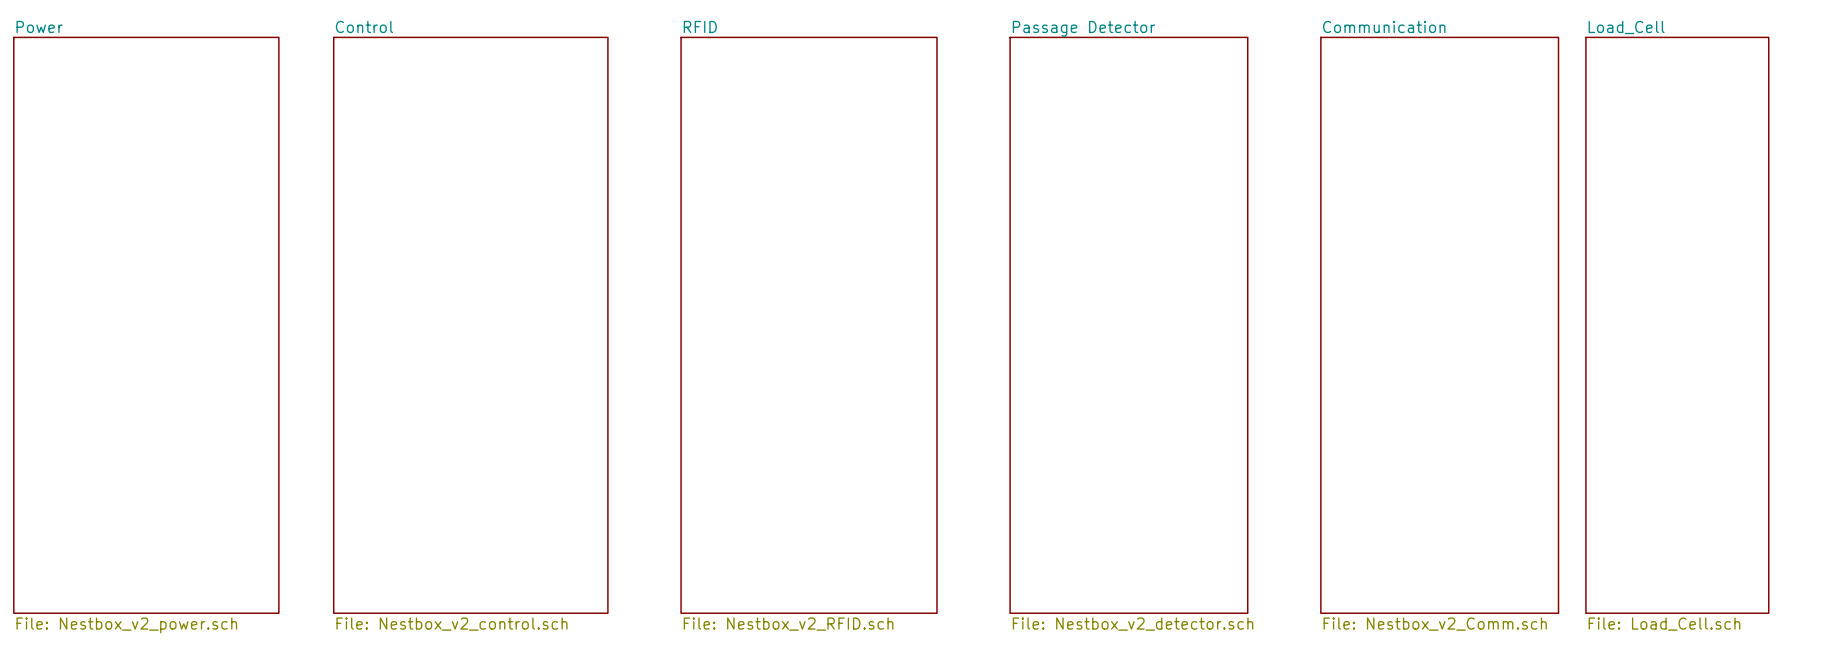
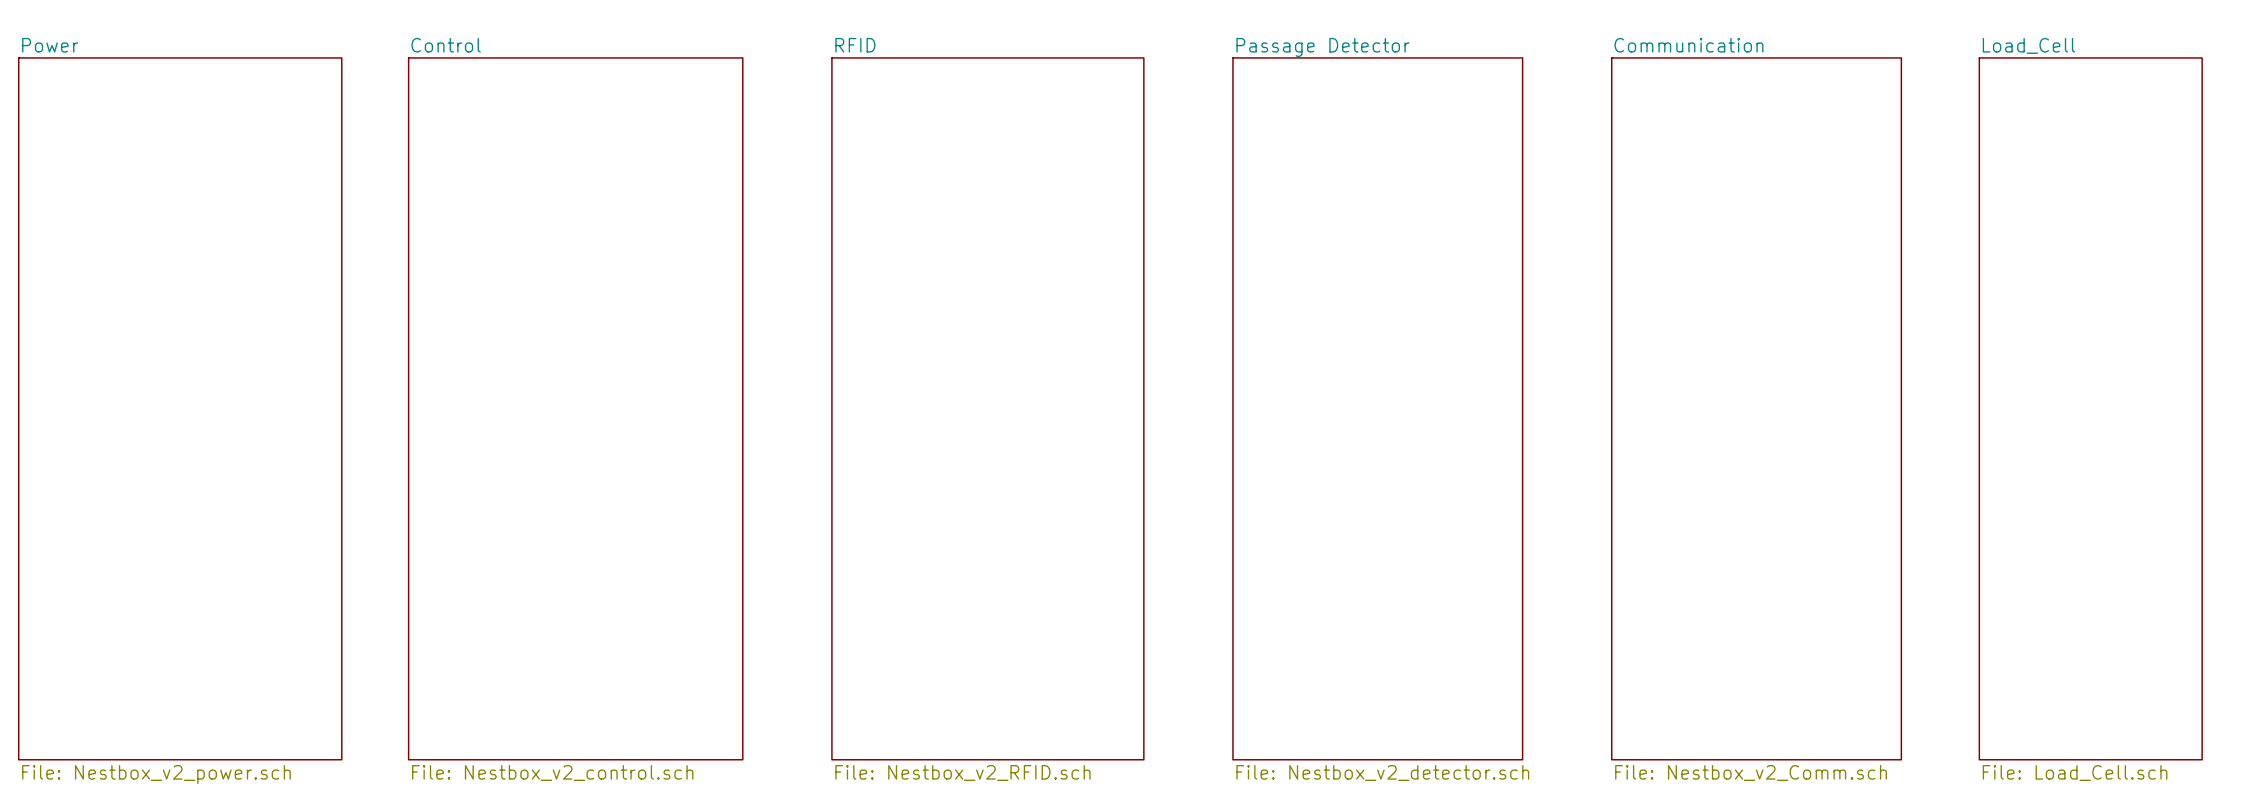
sheet Load_Cell position: (1677, 325) -> (2090, 408)

